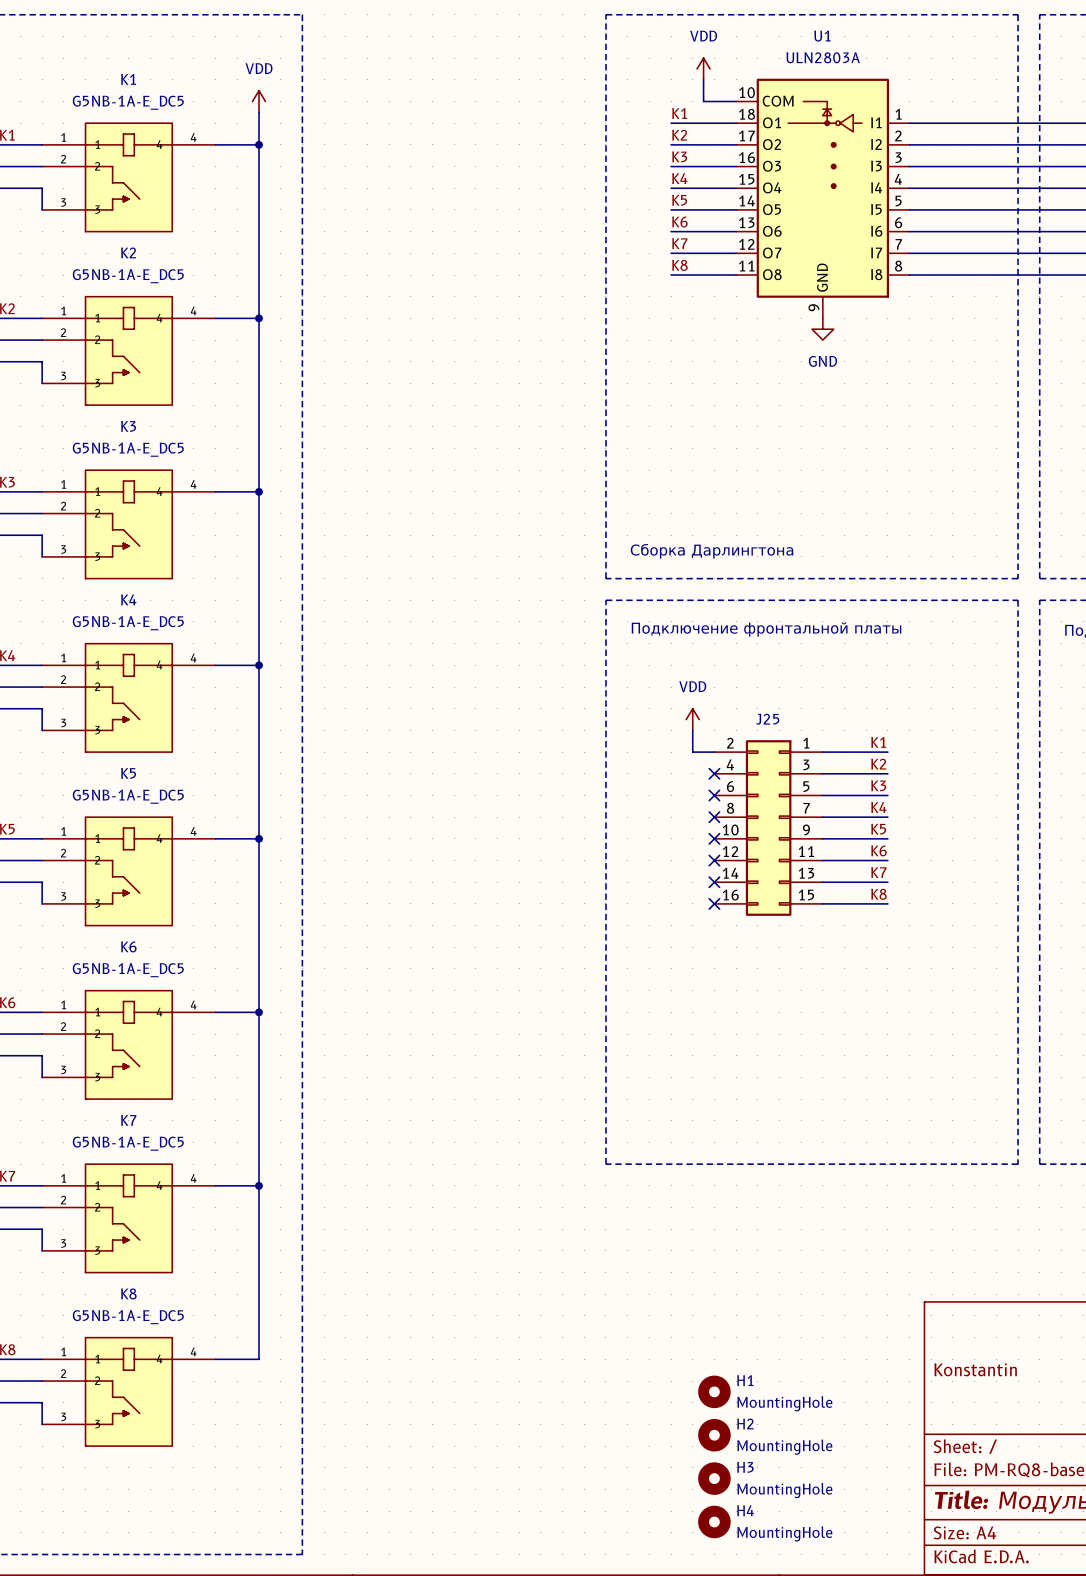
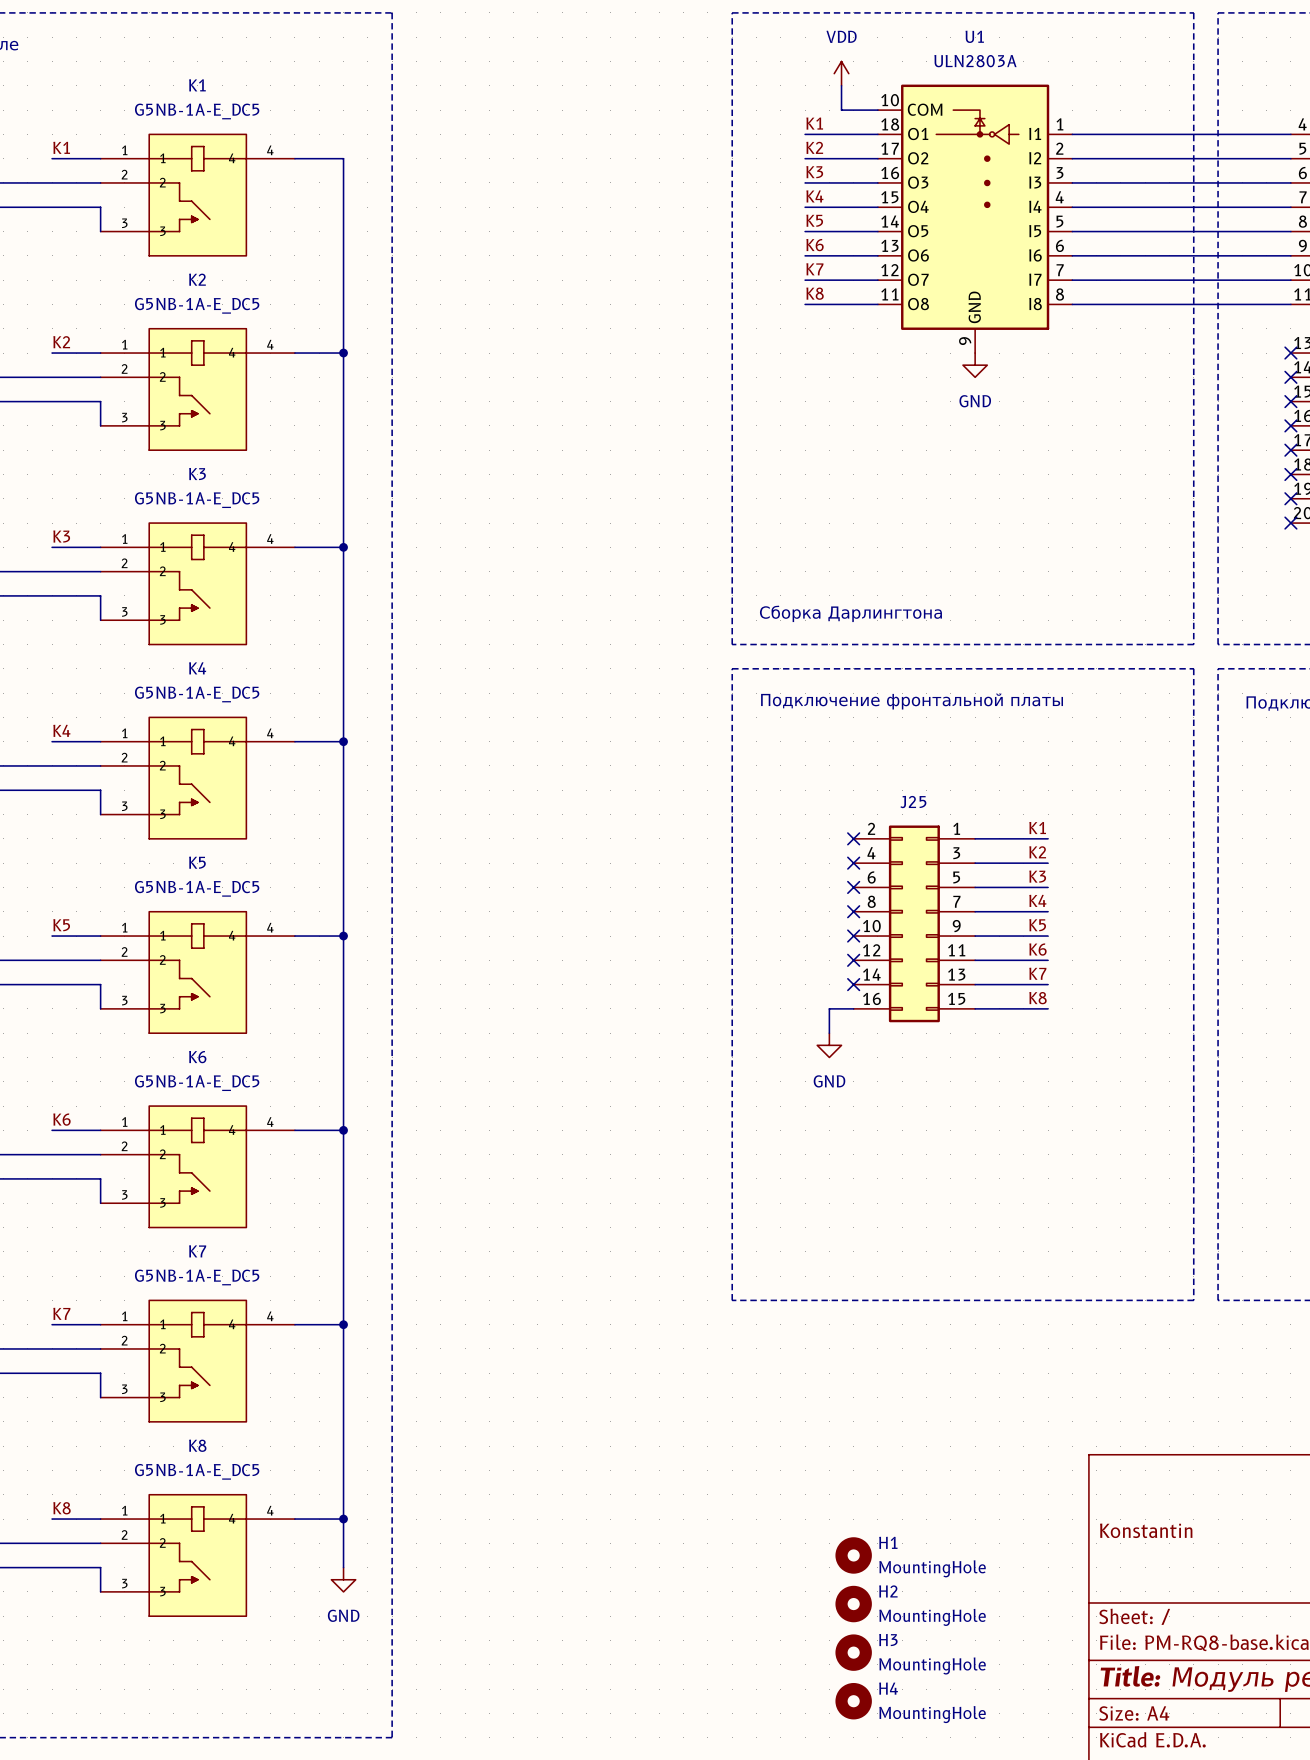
power symbol: VDD (259, 101) -> none
wire: (259, 112) (259, 144) -> none
junction: (259, 144) -> none
power symbol: VDD (692, 719) -> none
wire: (692, 730) (692, 752) (714, 752) -> none
no-connect mark: none -> (853, 838)
wire: none -> (853, 1008) (829, 1008) (829, 1033)
no-connect mark: (714, 903) -> none
power symbol: none -> GND (829, 1045)
wire: none -> (343, 1519) (343, 1567)
junction: none -> (343, 1519)
power symbol: none -> GND (343, 1579)

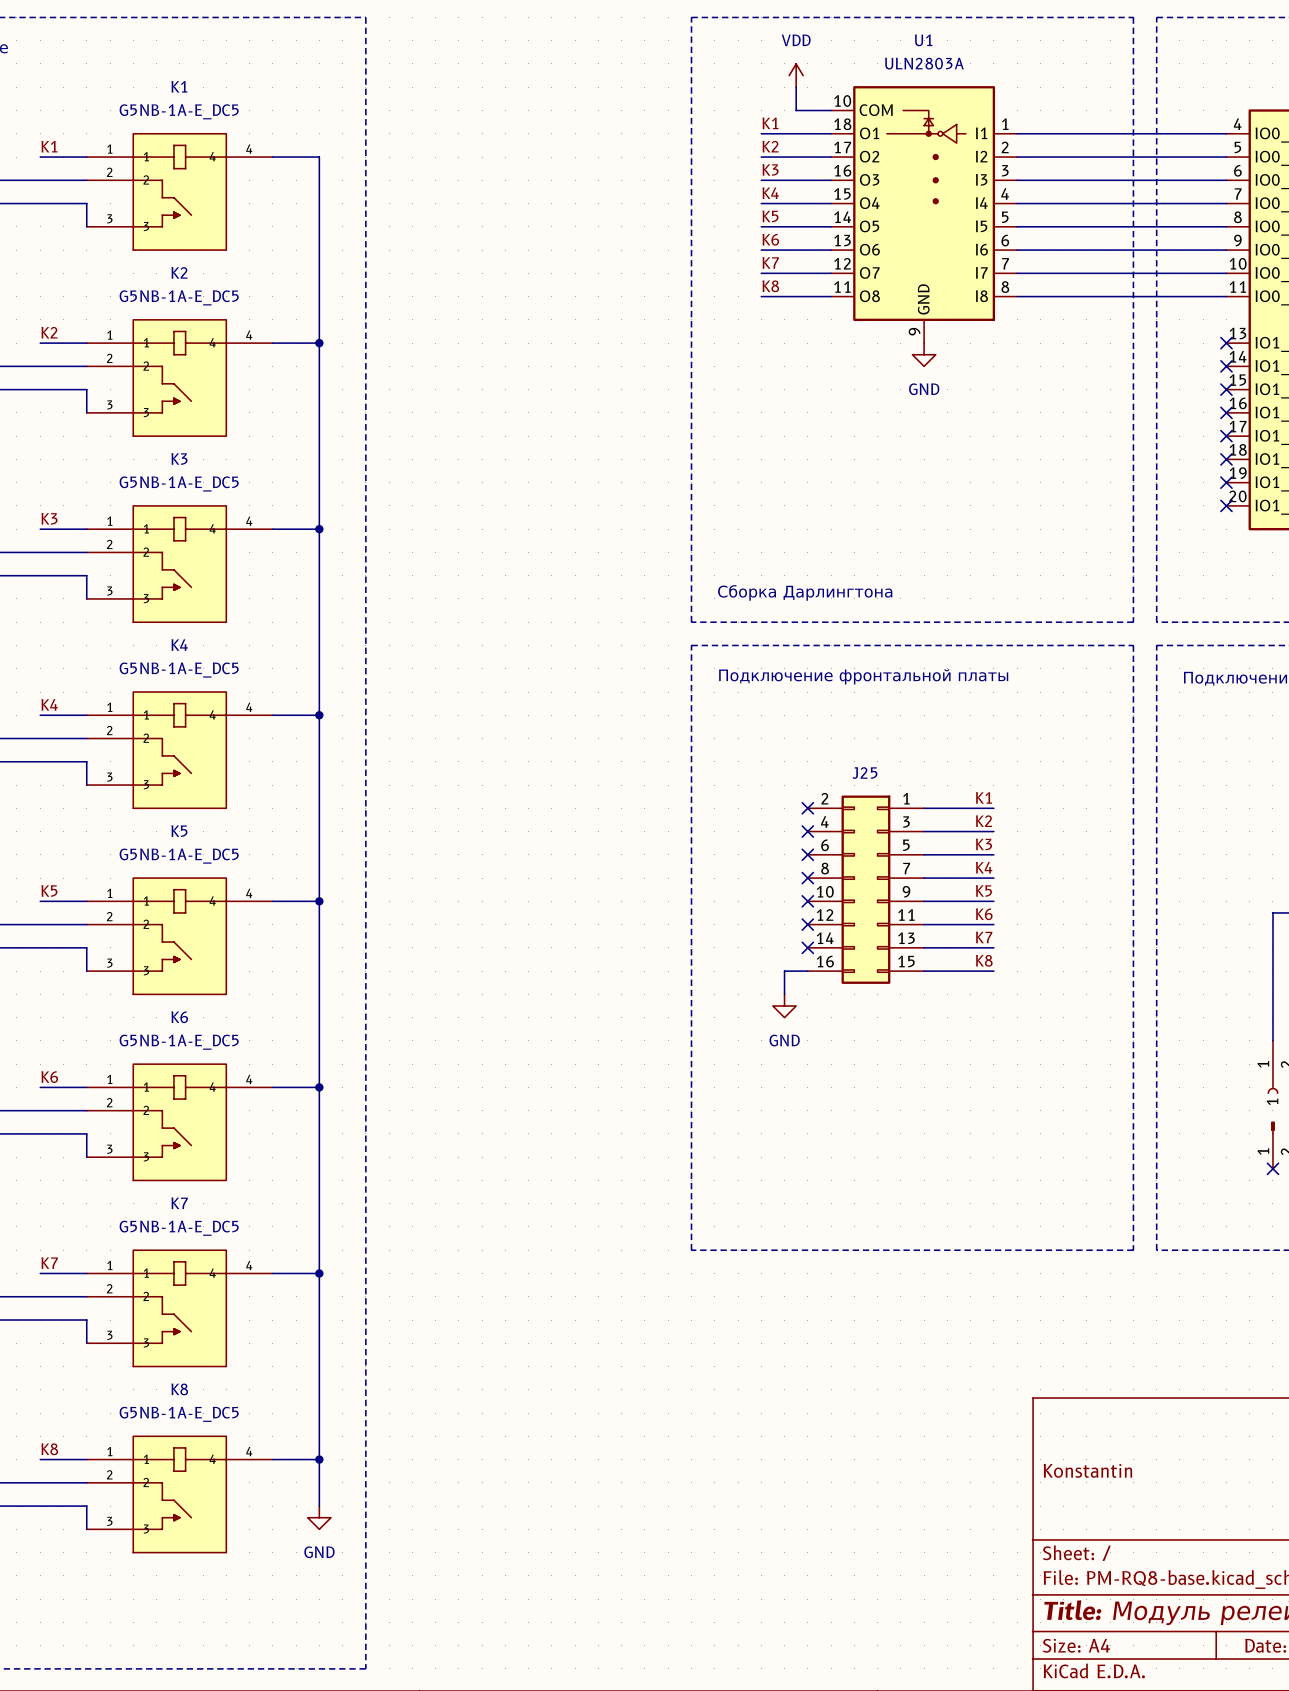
H1: MountingHole (853, 1555) -> none
H2: MountingHole (853, 1604) -> none
H3: MountingHole (853, 1652) -> none
H4: MountingHole (853, 1701) -> none

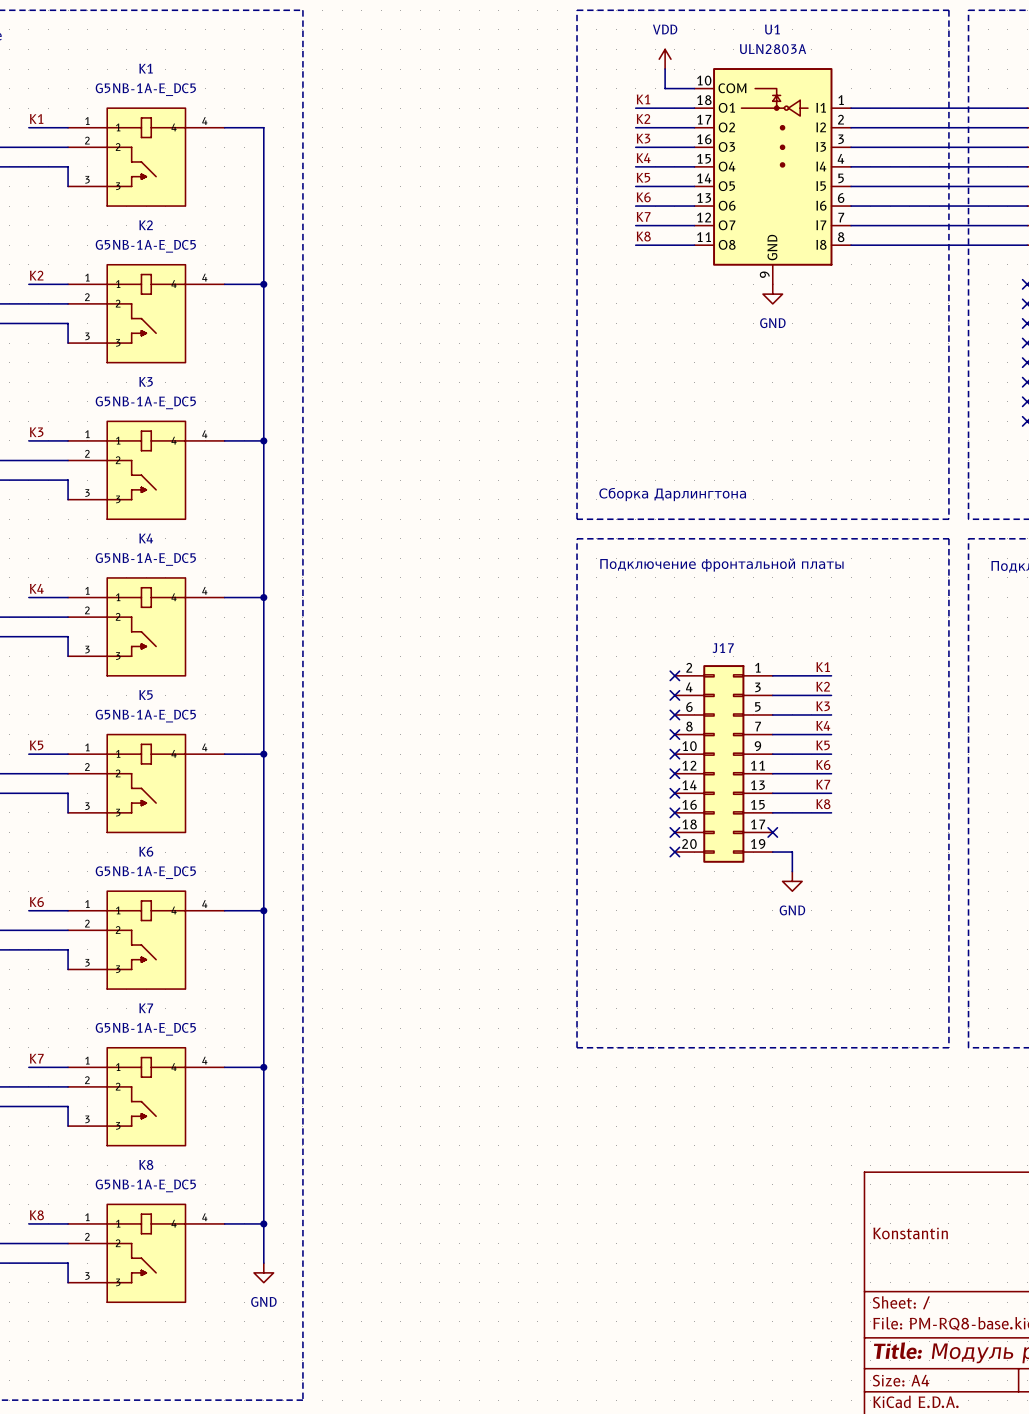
J25: (865, 889) -> none
J17: none -> (723, 763)
wire: (807, 971) (784, 971) (784, 994) -> none
no-connect mark: none -> (674, 812)
no-connect mark: none -> (674, 832)
no-connect mark: none -> (772, 832)
power symbol position: GND (784, 1006) -> GND (792, 881)
no-connect mark: none -> (674, 852)
wire: none -> (772, 852) (792, 852) (792, 871)

